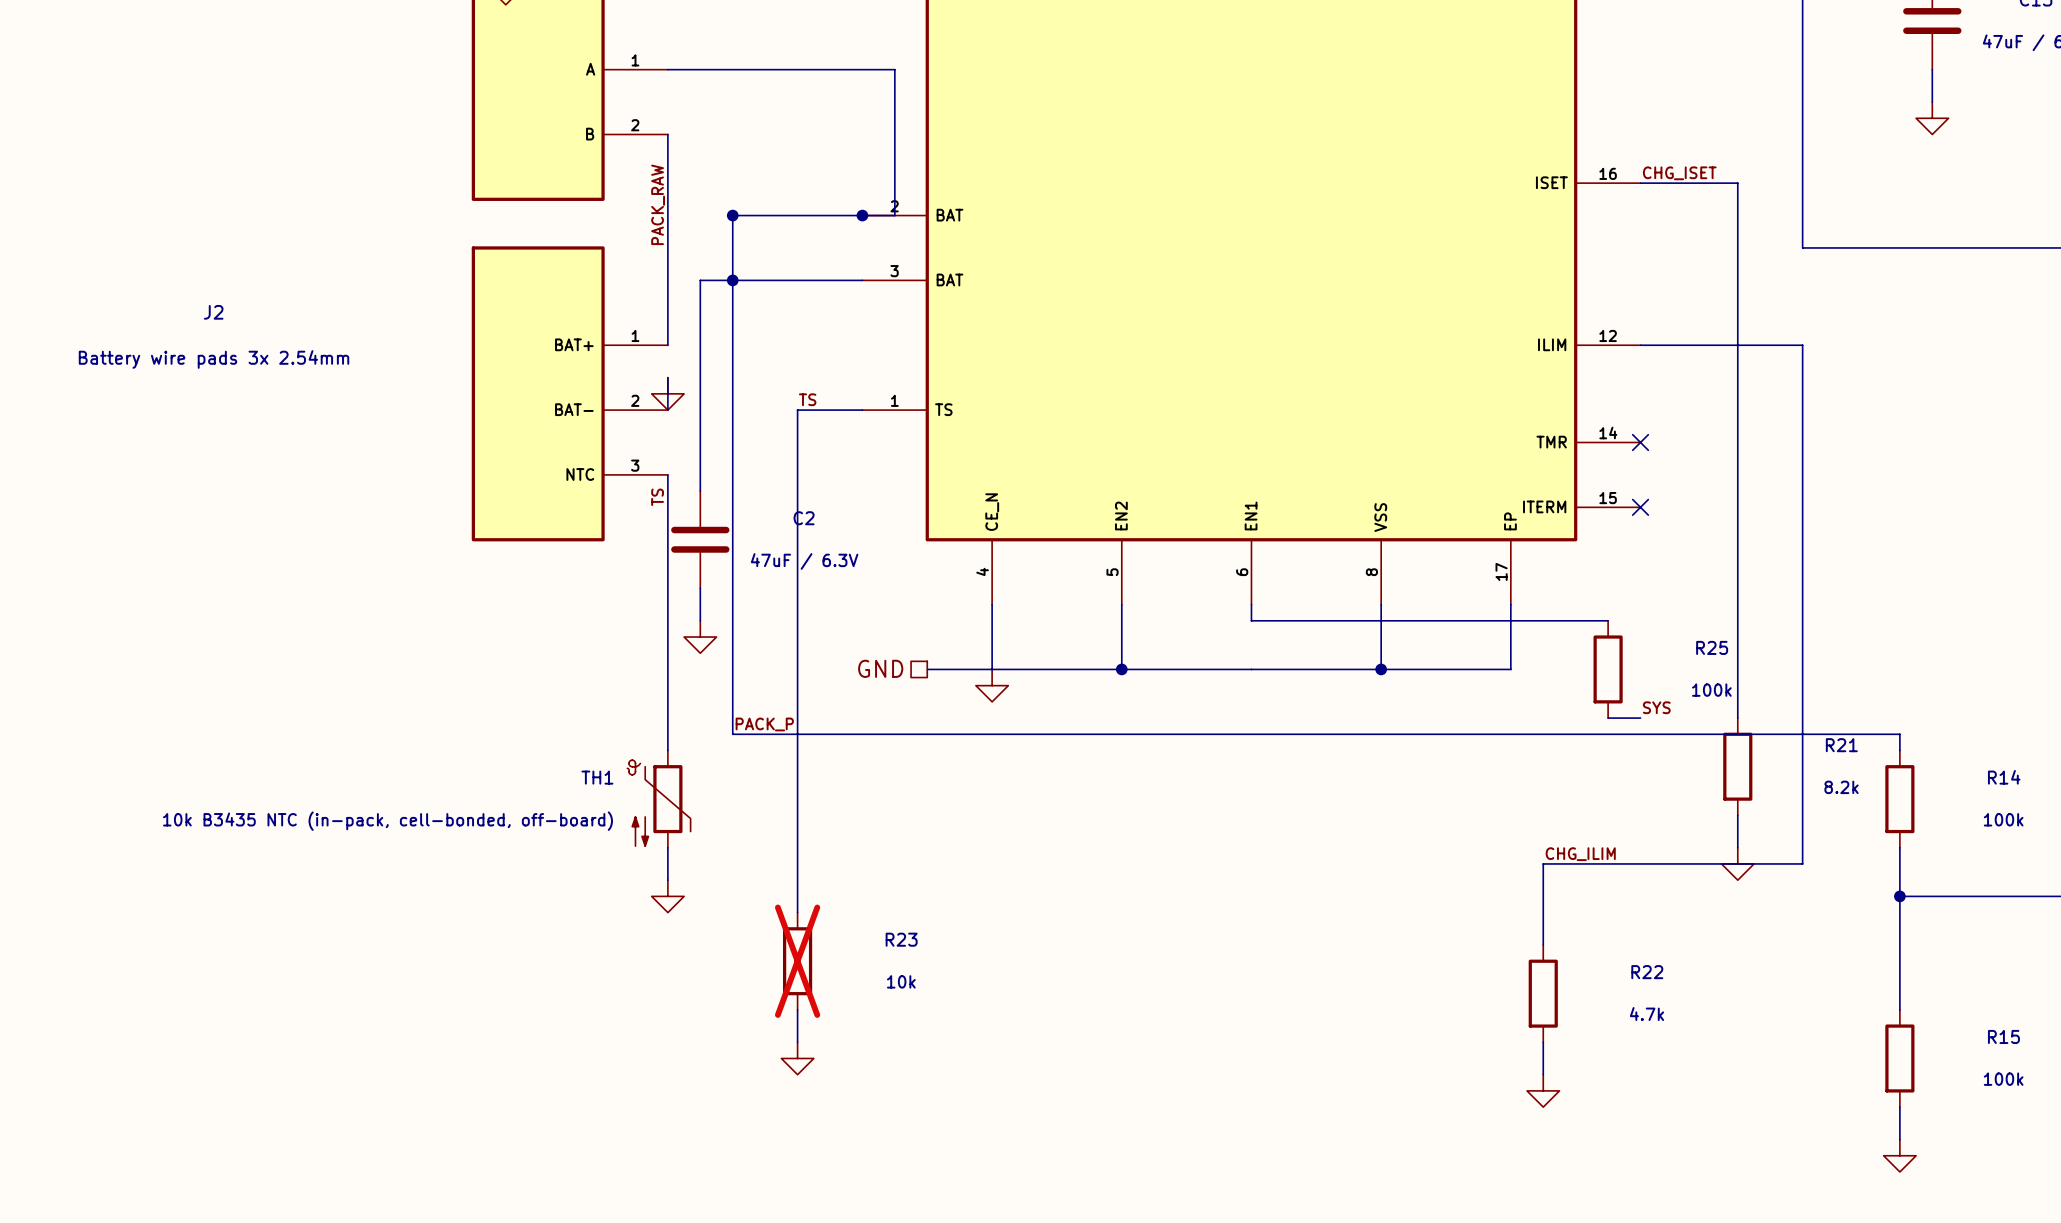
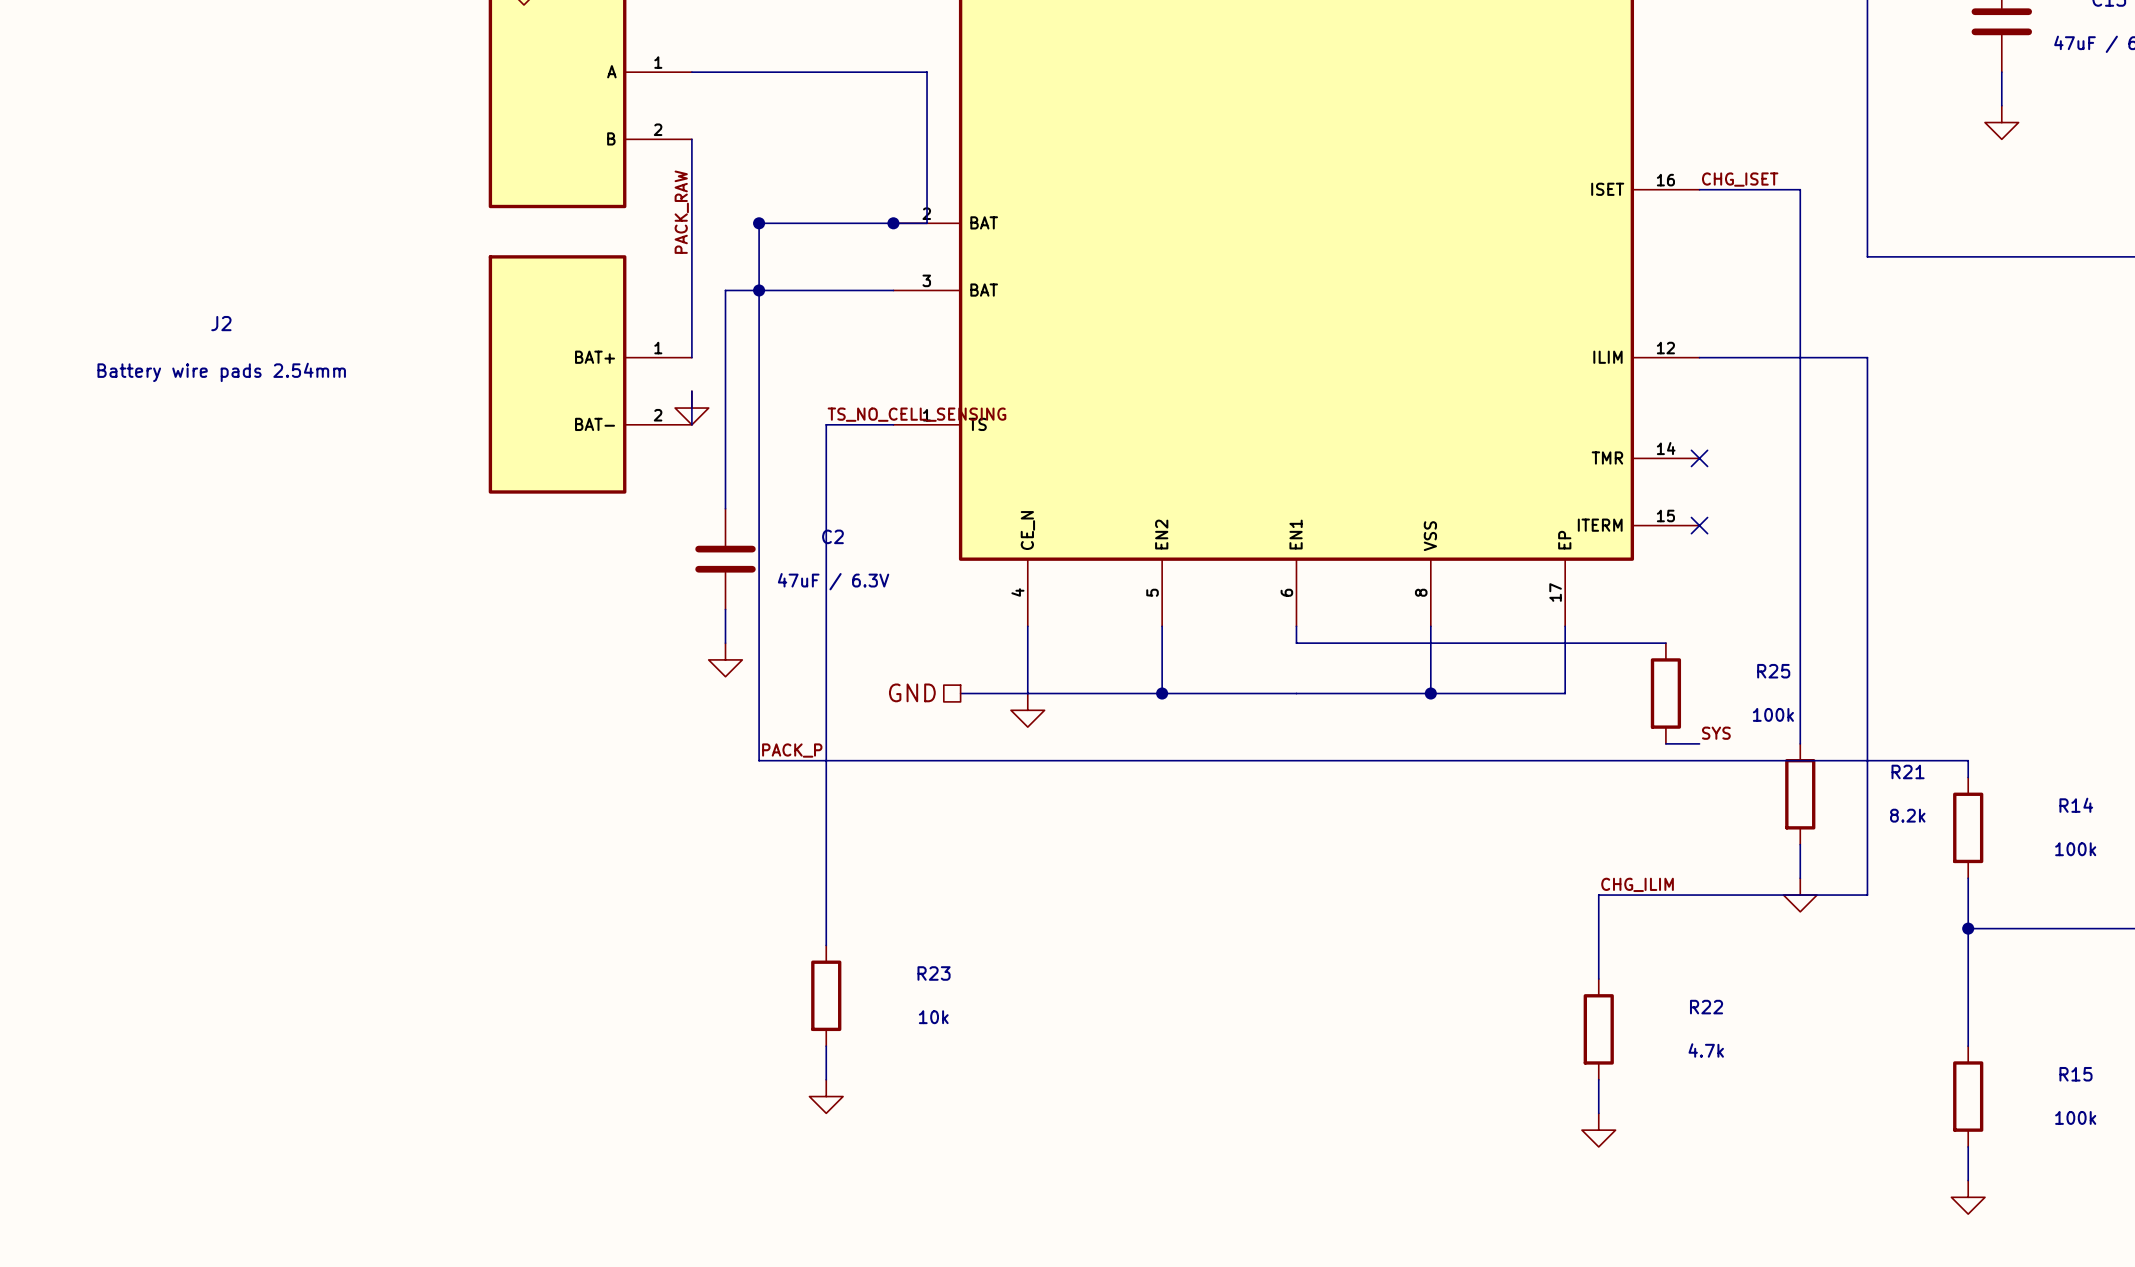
J2 symbol: [471, 246, 668, 542] -> [488, 255, 692, 494]
J2 value: Battery wire pads 3x 2.54mm (214, 359) -> Battery wire pads 2.54mm (221, 372)
label: TS (807, 399) -> TS_NO_CELL_SENSING (916, 414)
wire: (667, 474) (667, 750) -> none
label: TS (657, 497) -> none
TH1: 10k B3435 NTC (in-pack, cell-bonded, off-board) (658, 799) -> none
wire: (667, 847) (667, 880) -> none
power symbol: (667, 896) -> none
R23 do-not-place cross: (797, 961) -> none

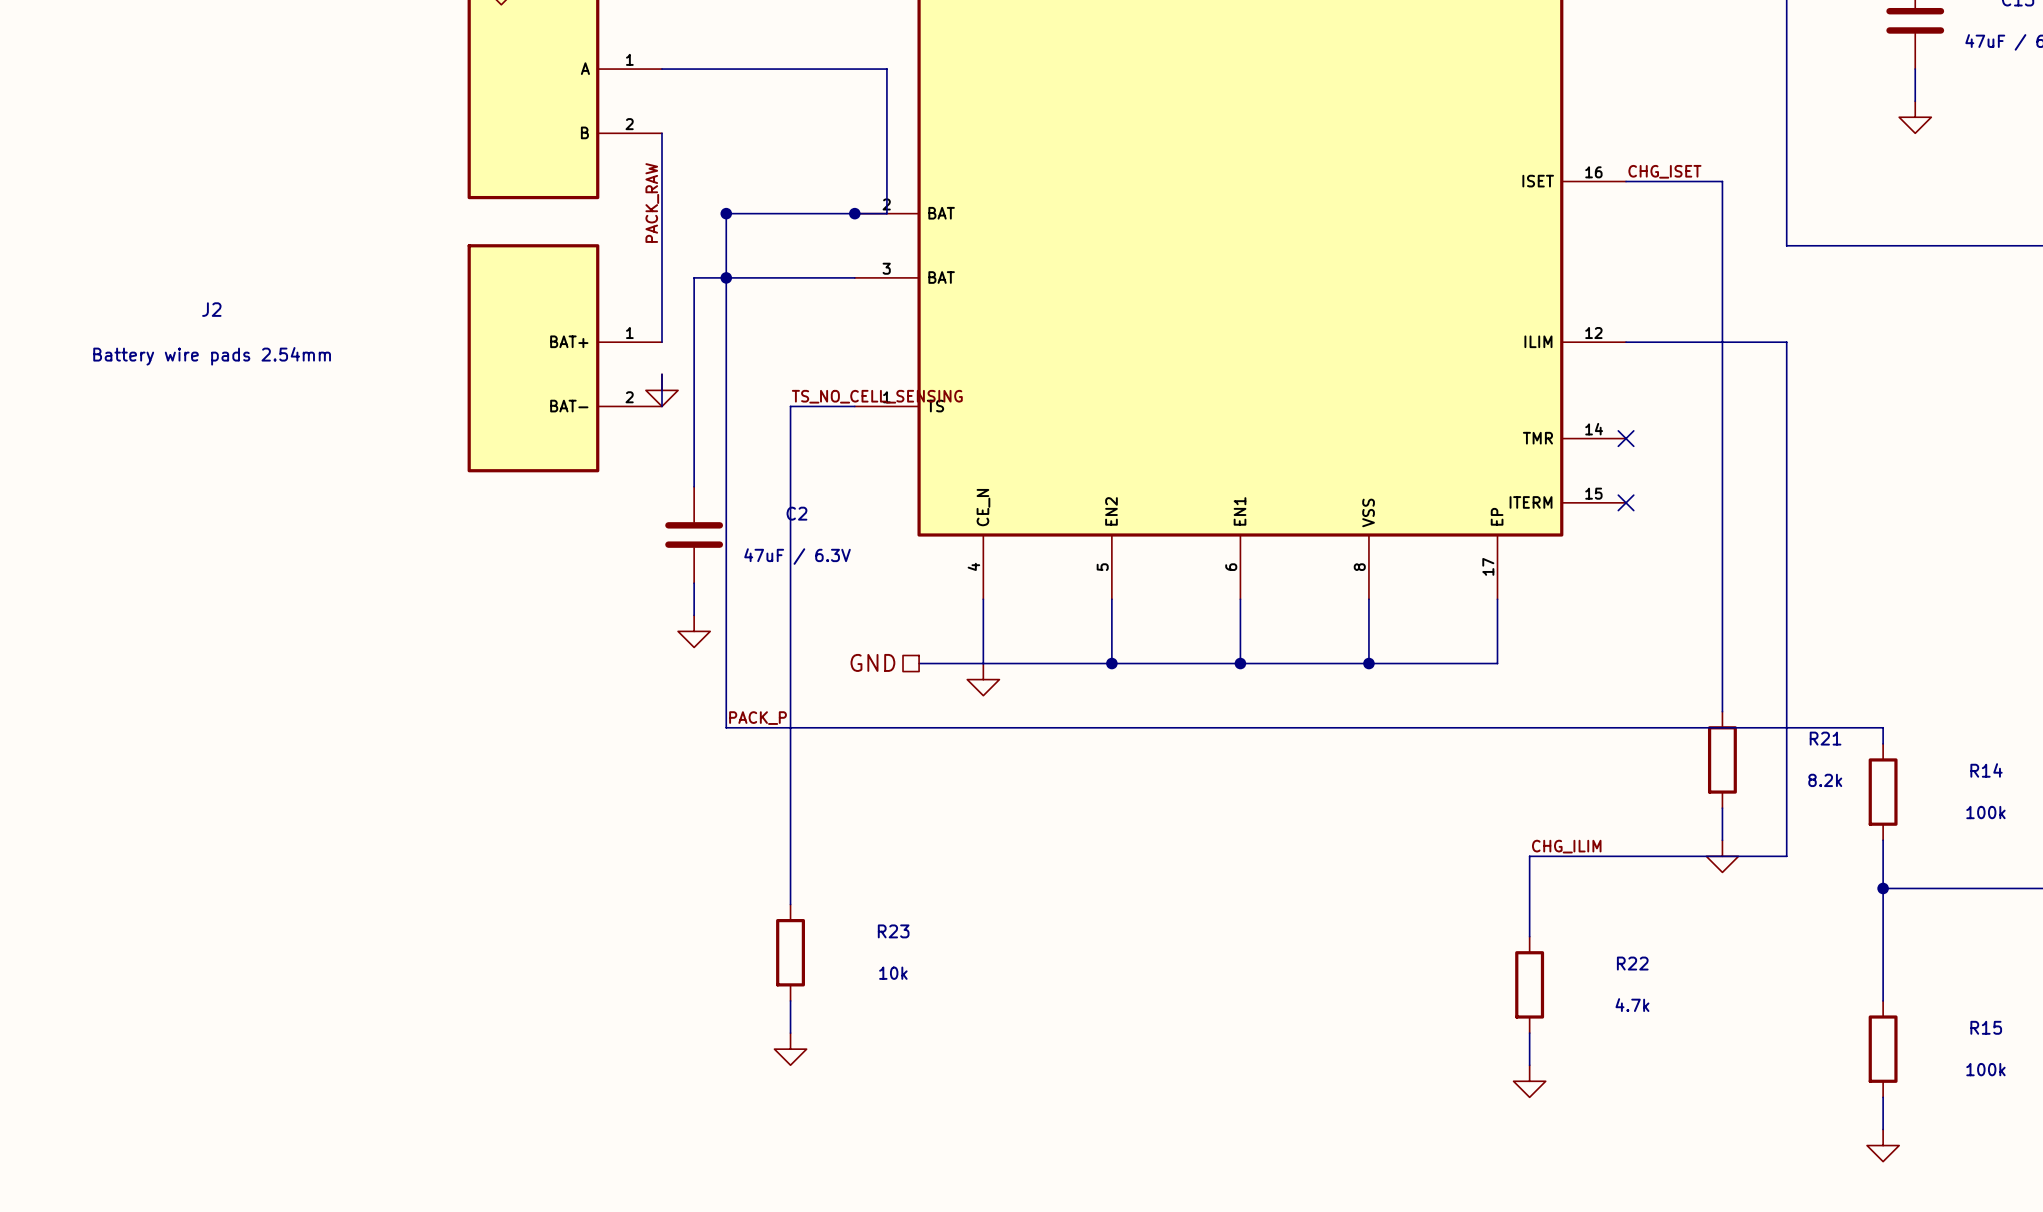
wire: (1296, 643) (1665, 643) -> (1240, 615) (1240, 663)
junction: none -> (1240, 663)
R25: 100k (1665, 693) -> none
label: SYS (1716, 733) -> none
wire: (1665, 743) (1699, 743) -> none

